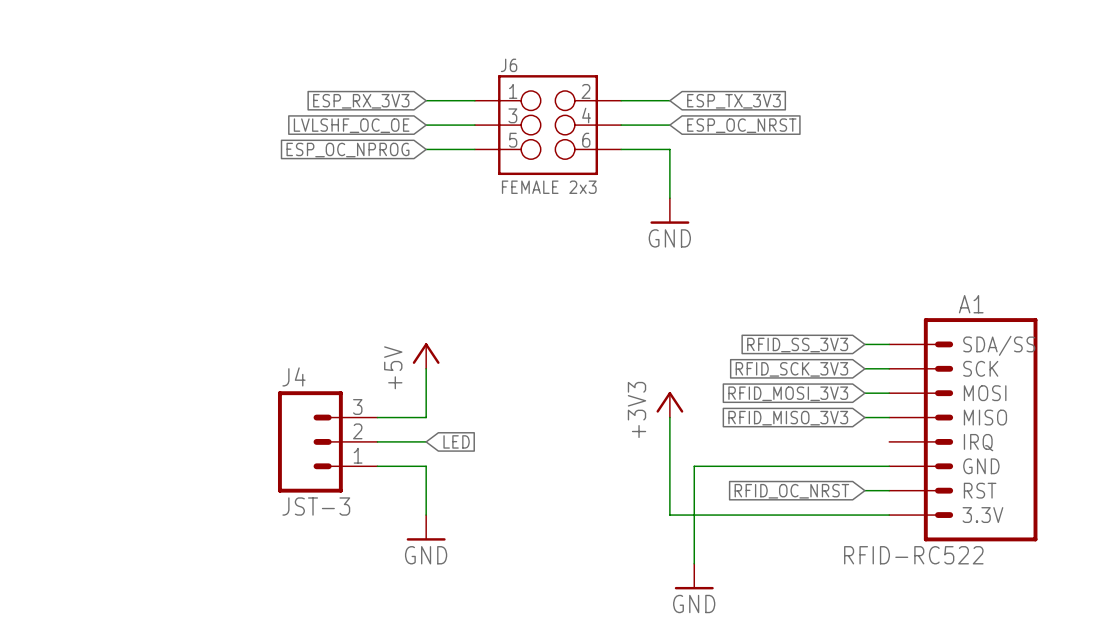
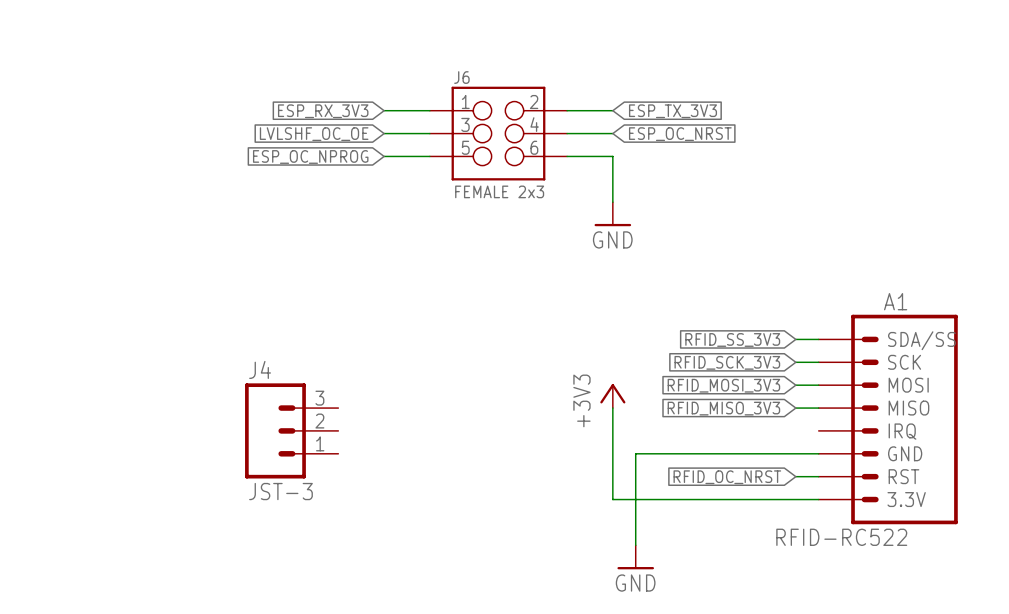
power symbol: +5V (426, 356) -> none
wire: (426, 368) (426, 417) (377, 417) -> none
wire: (377, 441) (426, 441) -> none
global label: LED (456, 441) -> none
wire: (377, 466) (426, 466) (426, 515) -> none
power symbol: GND (426, 527) -> none

